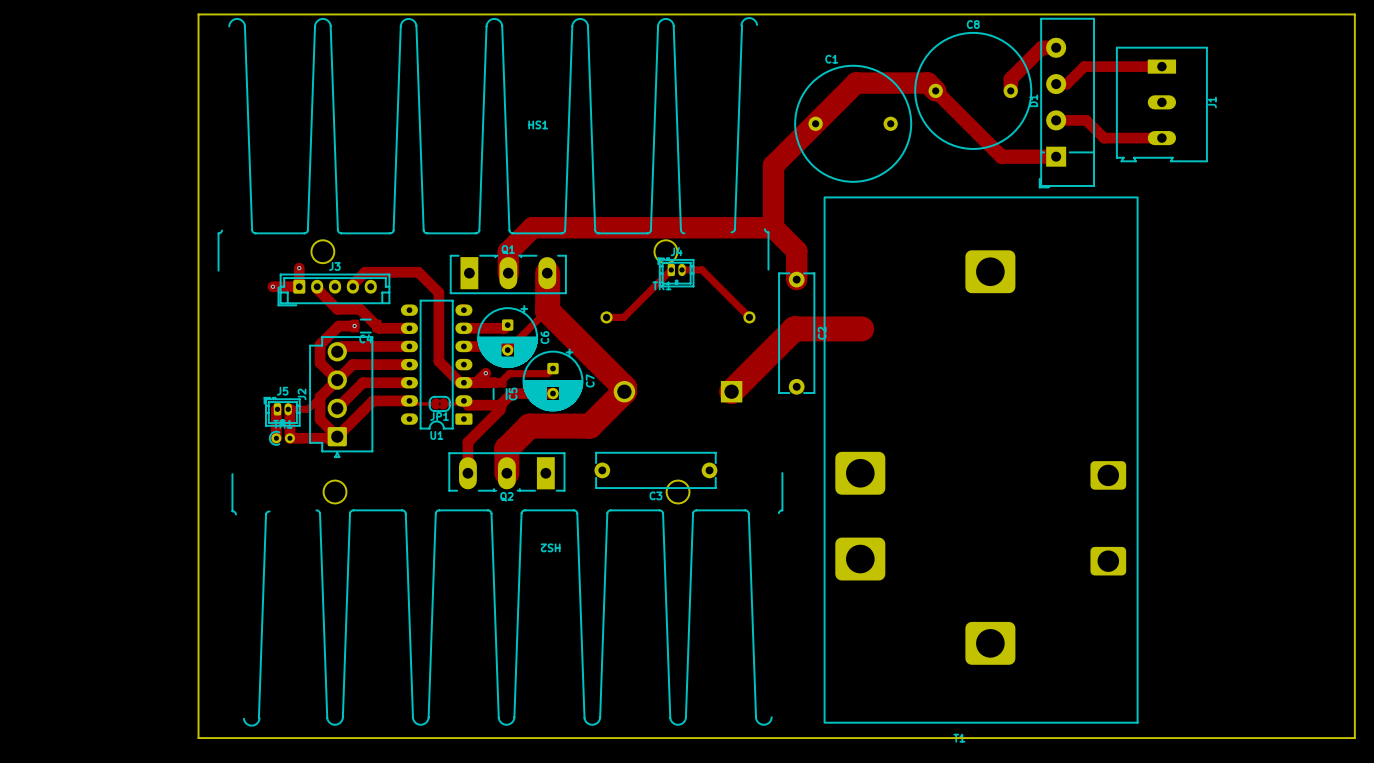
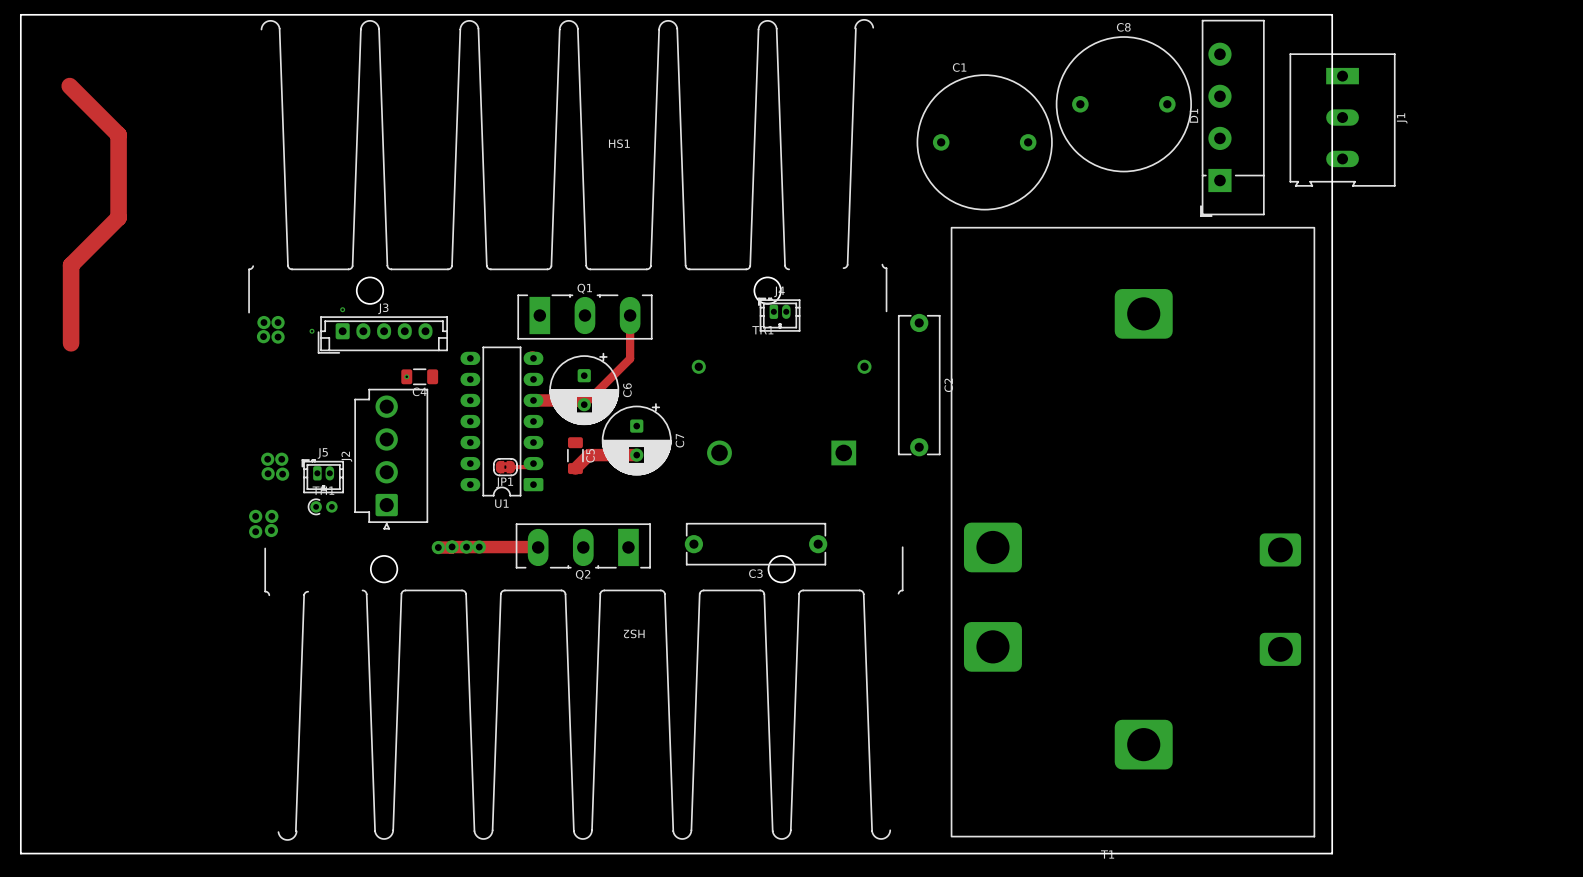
board edge: (198, 14) (1354, 14) (1354, 738) (198, 738) (198, 14) -> (20, 14) (20, 853) (1332, 853) (1332, 14) (20, 14)
track: (1056, 47) (1042, 47) (1010, 79) (1010, 90) -> none
track: (1161, 66) (1084, 66) (1066, 84) (1056, 84) -> none
track: none -> (69, 86) (118, 134) (118, 217) (71, 265) (71, 343)
track: (1056, 120) (1086, 120) (1104, 138) (1161, 138) -> none
track: (1056, 156) (1001, 156) (927, 83) (856, 83) (773, 165) (773, 227) -> none
track: (773, 227) (532, 227) (508, 251) (508, 273) -> none
track: (773, 227) (796, 251) (796, 279) -> none
track: (299, 268) (299, 286) (272, 286) -> none
track: (671, 269) (623, 317) (606, 317) -> none
track: (682, 269) (702, 269) (749, 317) -> none
track: (547, 273) (547, 310) (624, 387) (624, 391) (590, 426) (529, 426) (506, 448) (506, 473) -> none
via: none -> (263, 322)
via: none -> (278, 322)
track: (317, 286) (337, 309) (360, 309) (379, 328) (409, 328) -> none
track: (352, 286) (365, 272) (418, 272) (438, 292) (438, 361) (460, 382) (494, 382) -> none
via: none -> (263, 336)
via: none -> (278, 337)
track: (507, 325) (504, 328) (463, 328) -> none
track: (354, 326) (338, 326) (320, 344) (320, 362) (337, 380) (308, 409) (288, 409) -> none
track: (861, 328) (794, 328) (731, 391) -> none
track: (409, 346) (342, 346) (337, 351) -> none
track: (409, 364) (352, 364) (320, 397) (320, 419) (337, 436) -> none
track: (553, 368) (547, 373) (509, 373) (500, 382) -> none
track: (485, 373) (476, 382) -> none
via: (485, 373) -> none
track: (409, 382) (362, 382) (337, 408) -> none
via: none -> (267, 459)
via: none -> (281, 459)
track: (409, 400) (373, 400) (335, 438) (289, 438) (289, 409) -> none
track: (460, 400) (463, 400) (468, 405) (500, 405) (500, 410) (467, 442) (467, 473) -> (438, 547) (538, 547)
track: (412, 403) (435, 403) -> none
via: none -> (268, 473)
track: (277, 409) (276, 438) -> none
via: none -> (282, 474)
via: none -> (255, 516)
via: none -> (271, 516)
via: none -> (271, 530)
via: none -> (255, 531)
via: none -> (452, 546)
via: none -> (466, 547)
via: none -> (479, 547)
via: none -> (438, 547)

